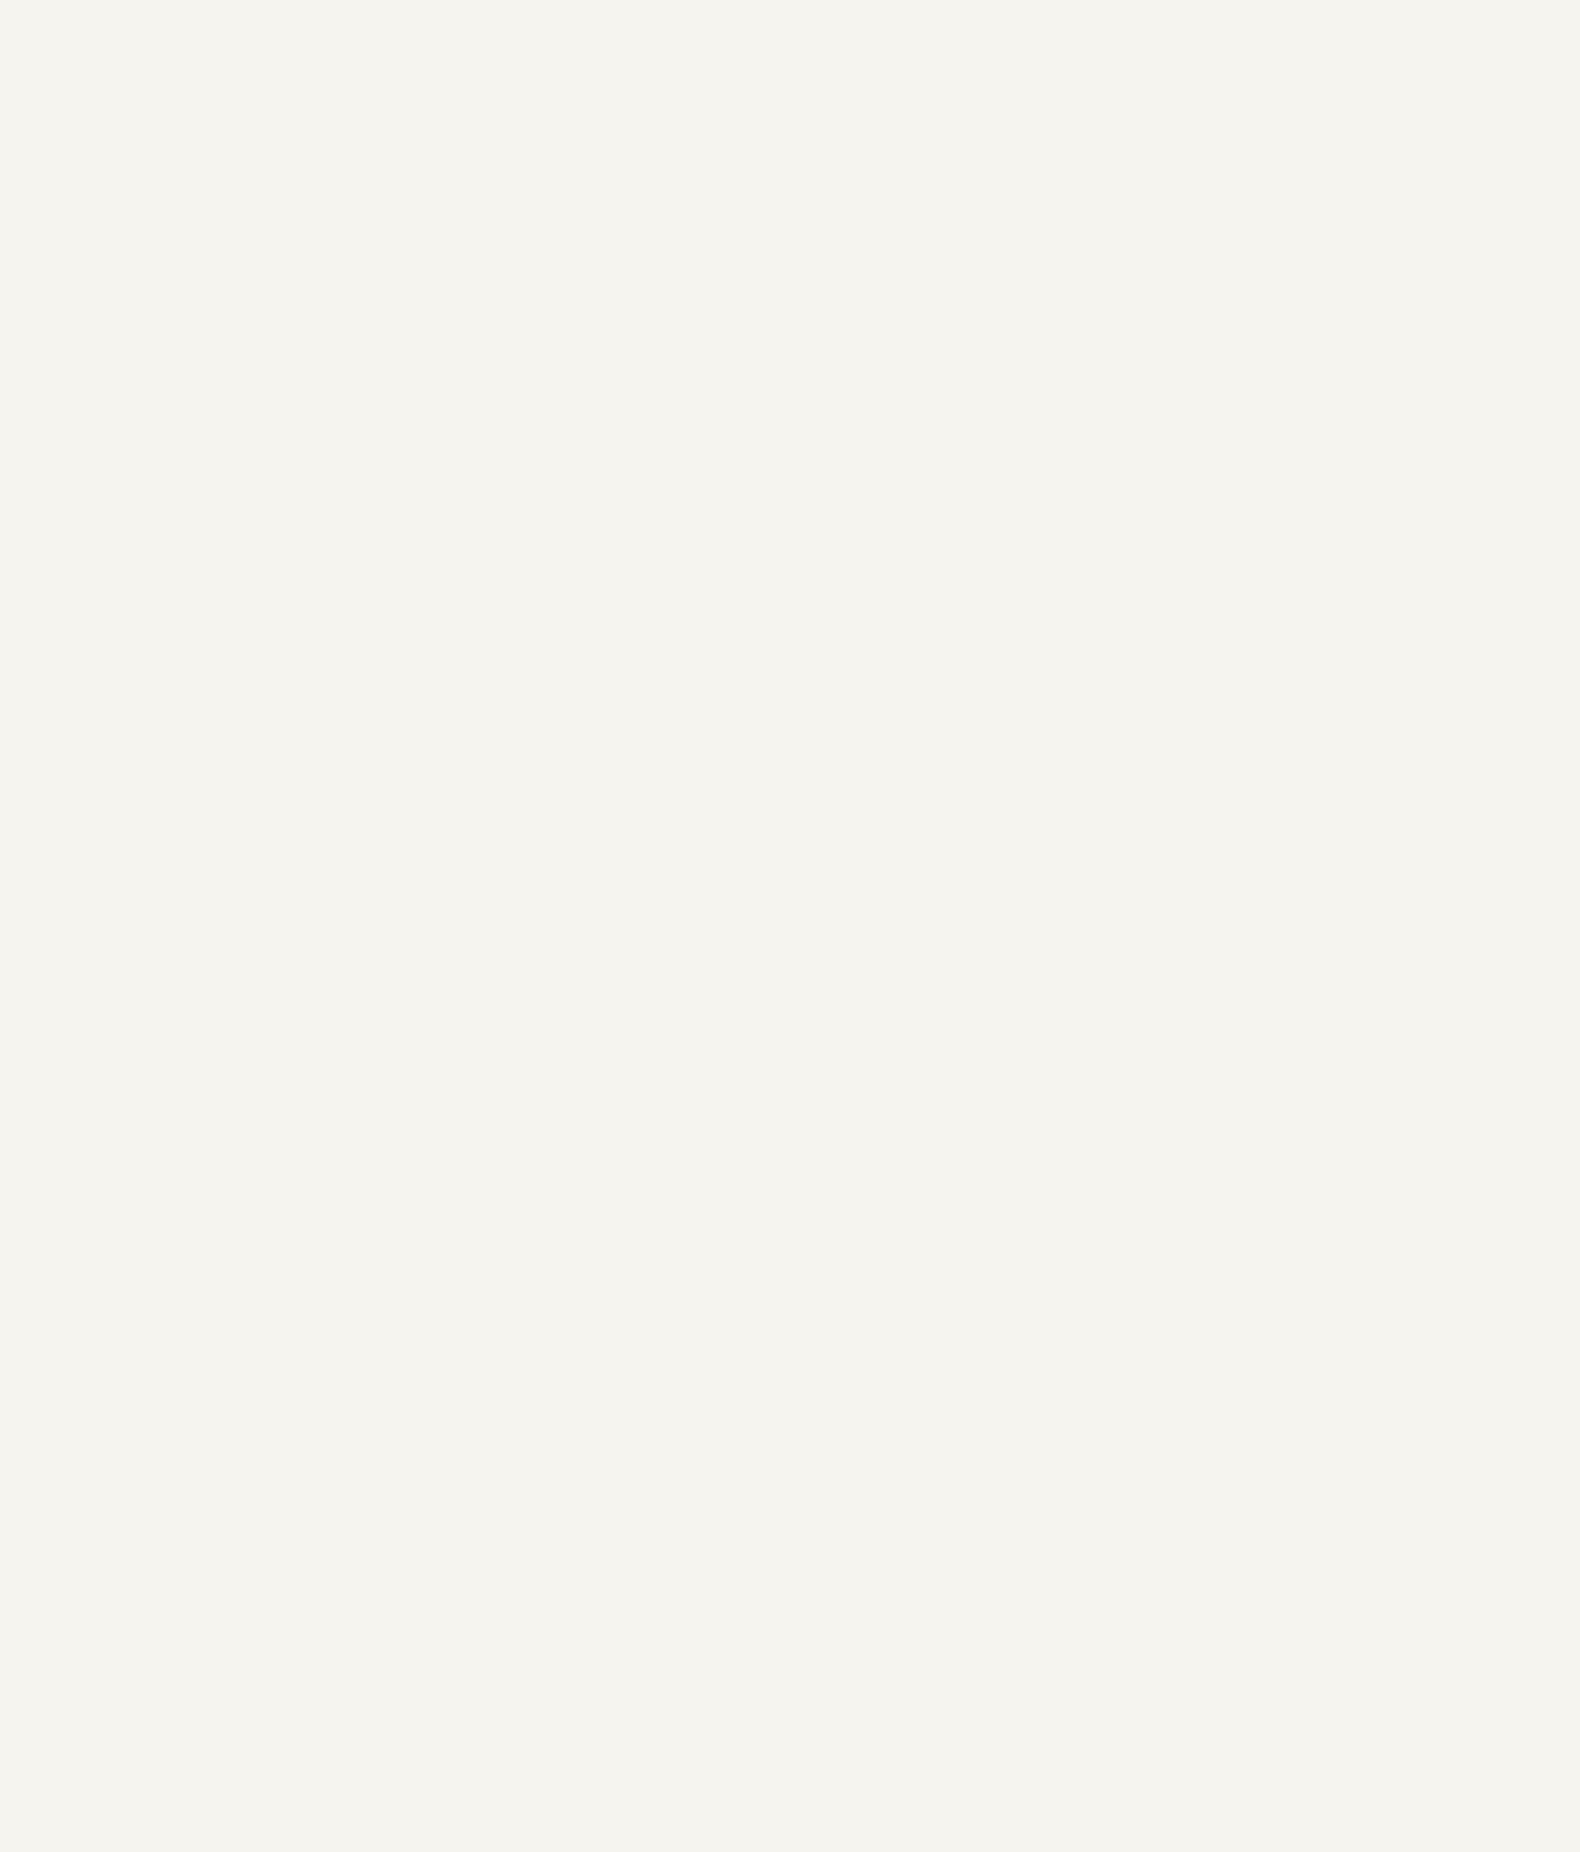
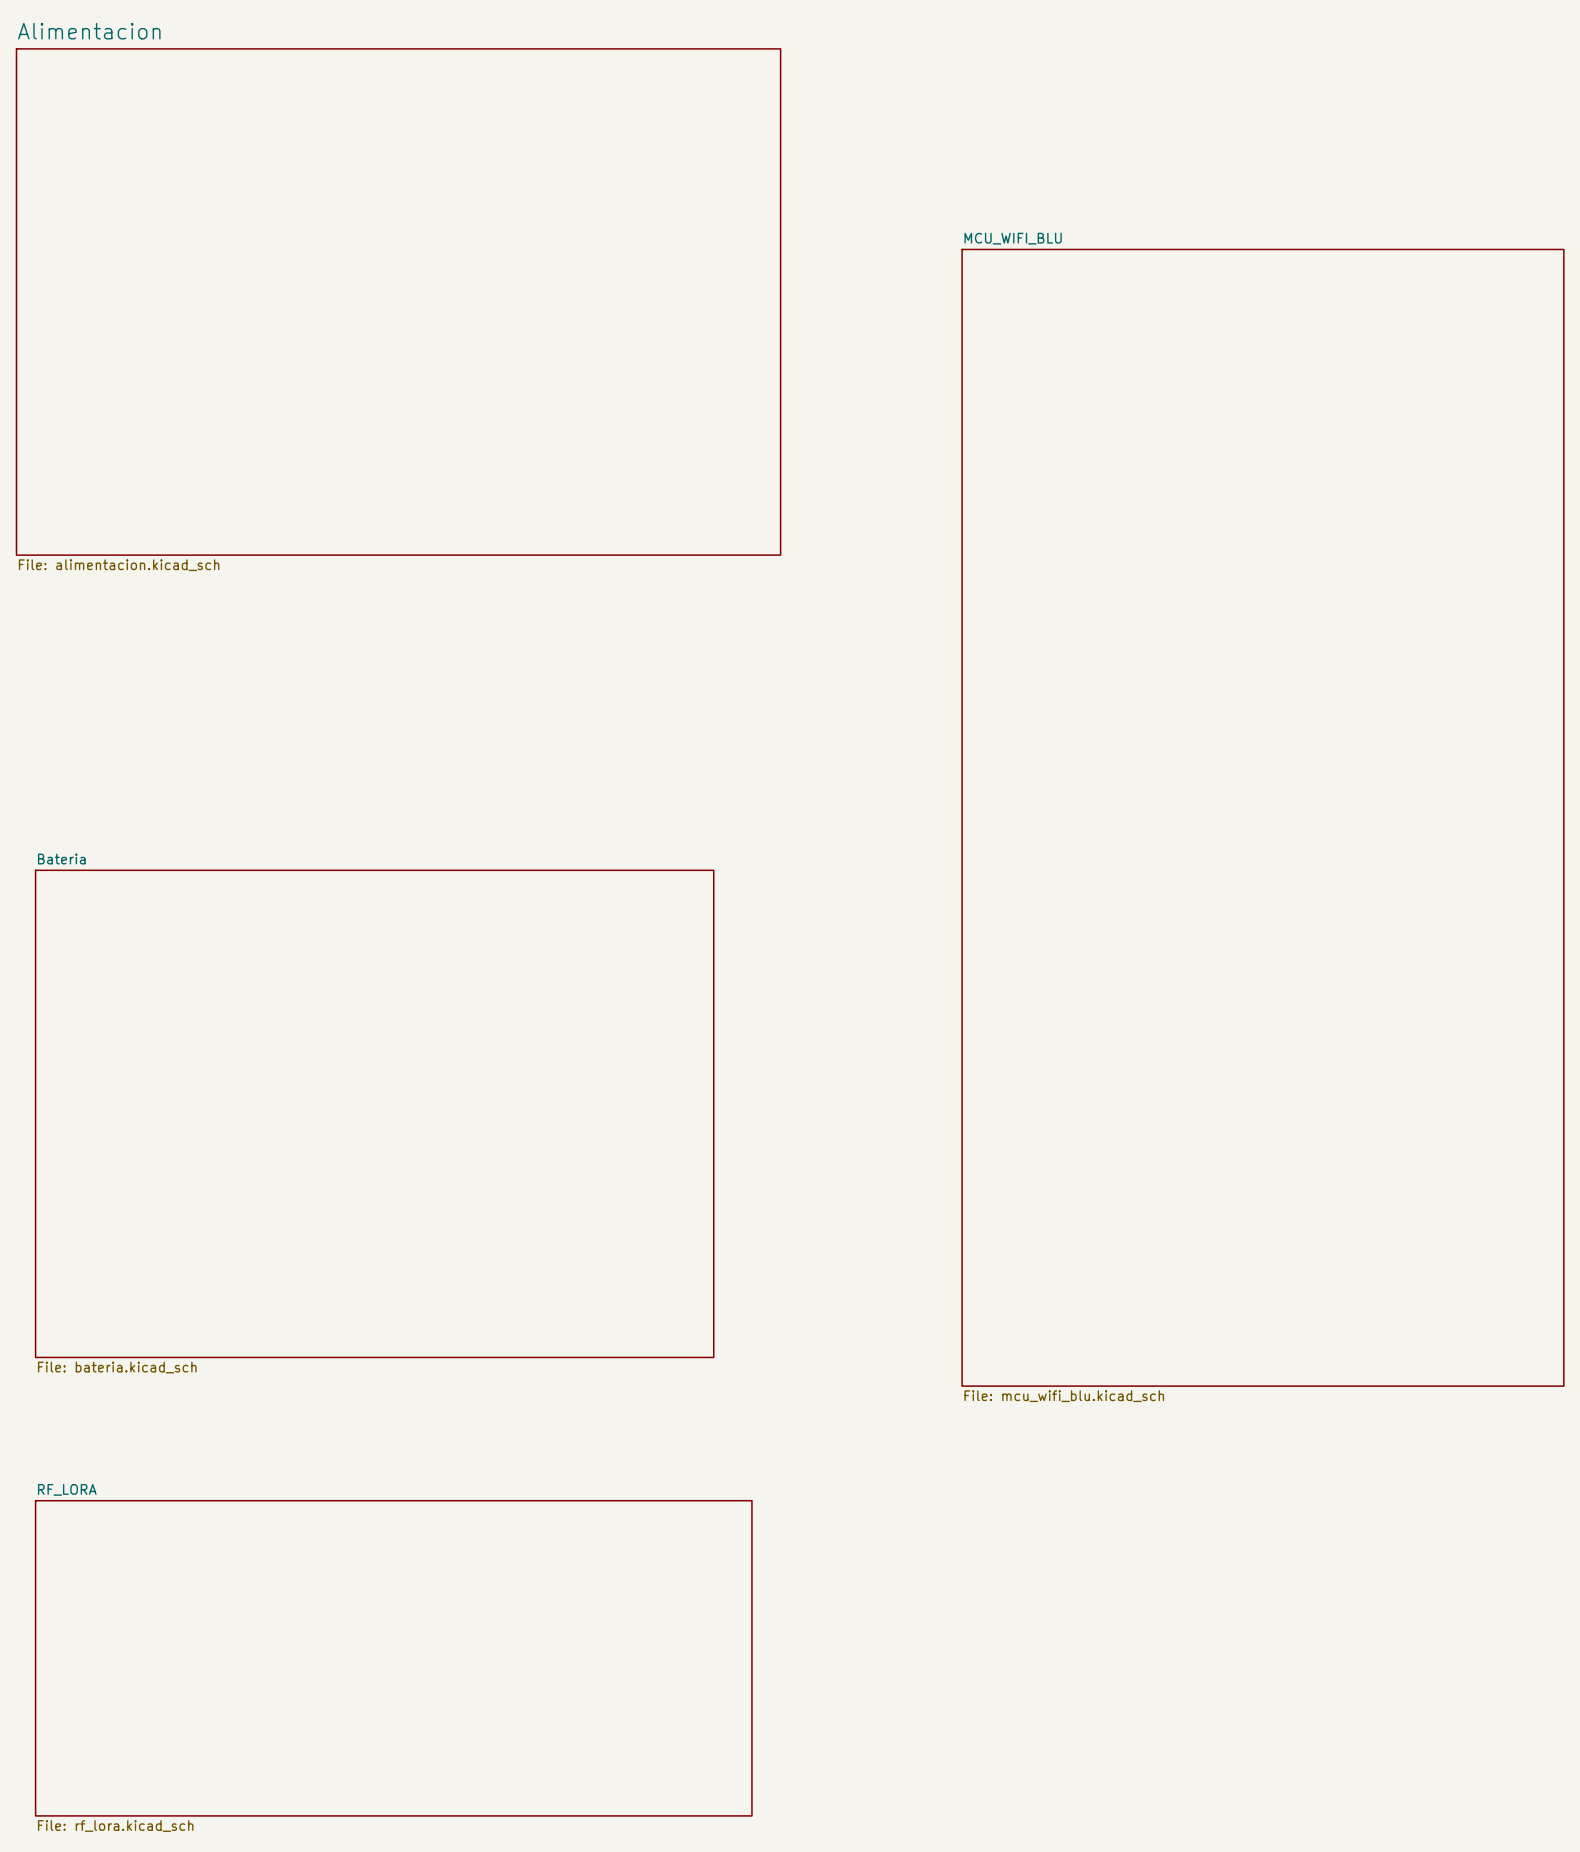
sheet Alimentacion: none -> File: alimentacion.kicad_sch (398, 302)
sheet MCU_WIFI_BLU: none -> File: mcu_wifi_blu.kicad_sch (1262, 817)
sheet Bateria: none -> File: bateria.kicad_sch (374, 1113)
sheet RF_LORA: none -> File: rf_lora.kicad_sch (393, 1658)

